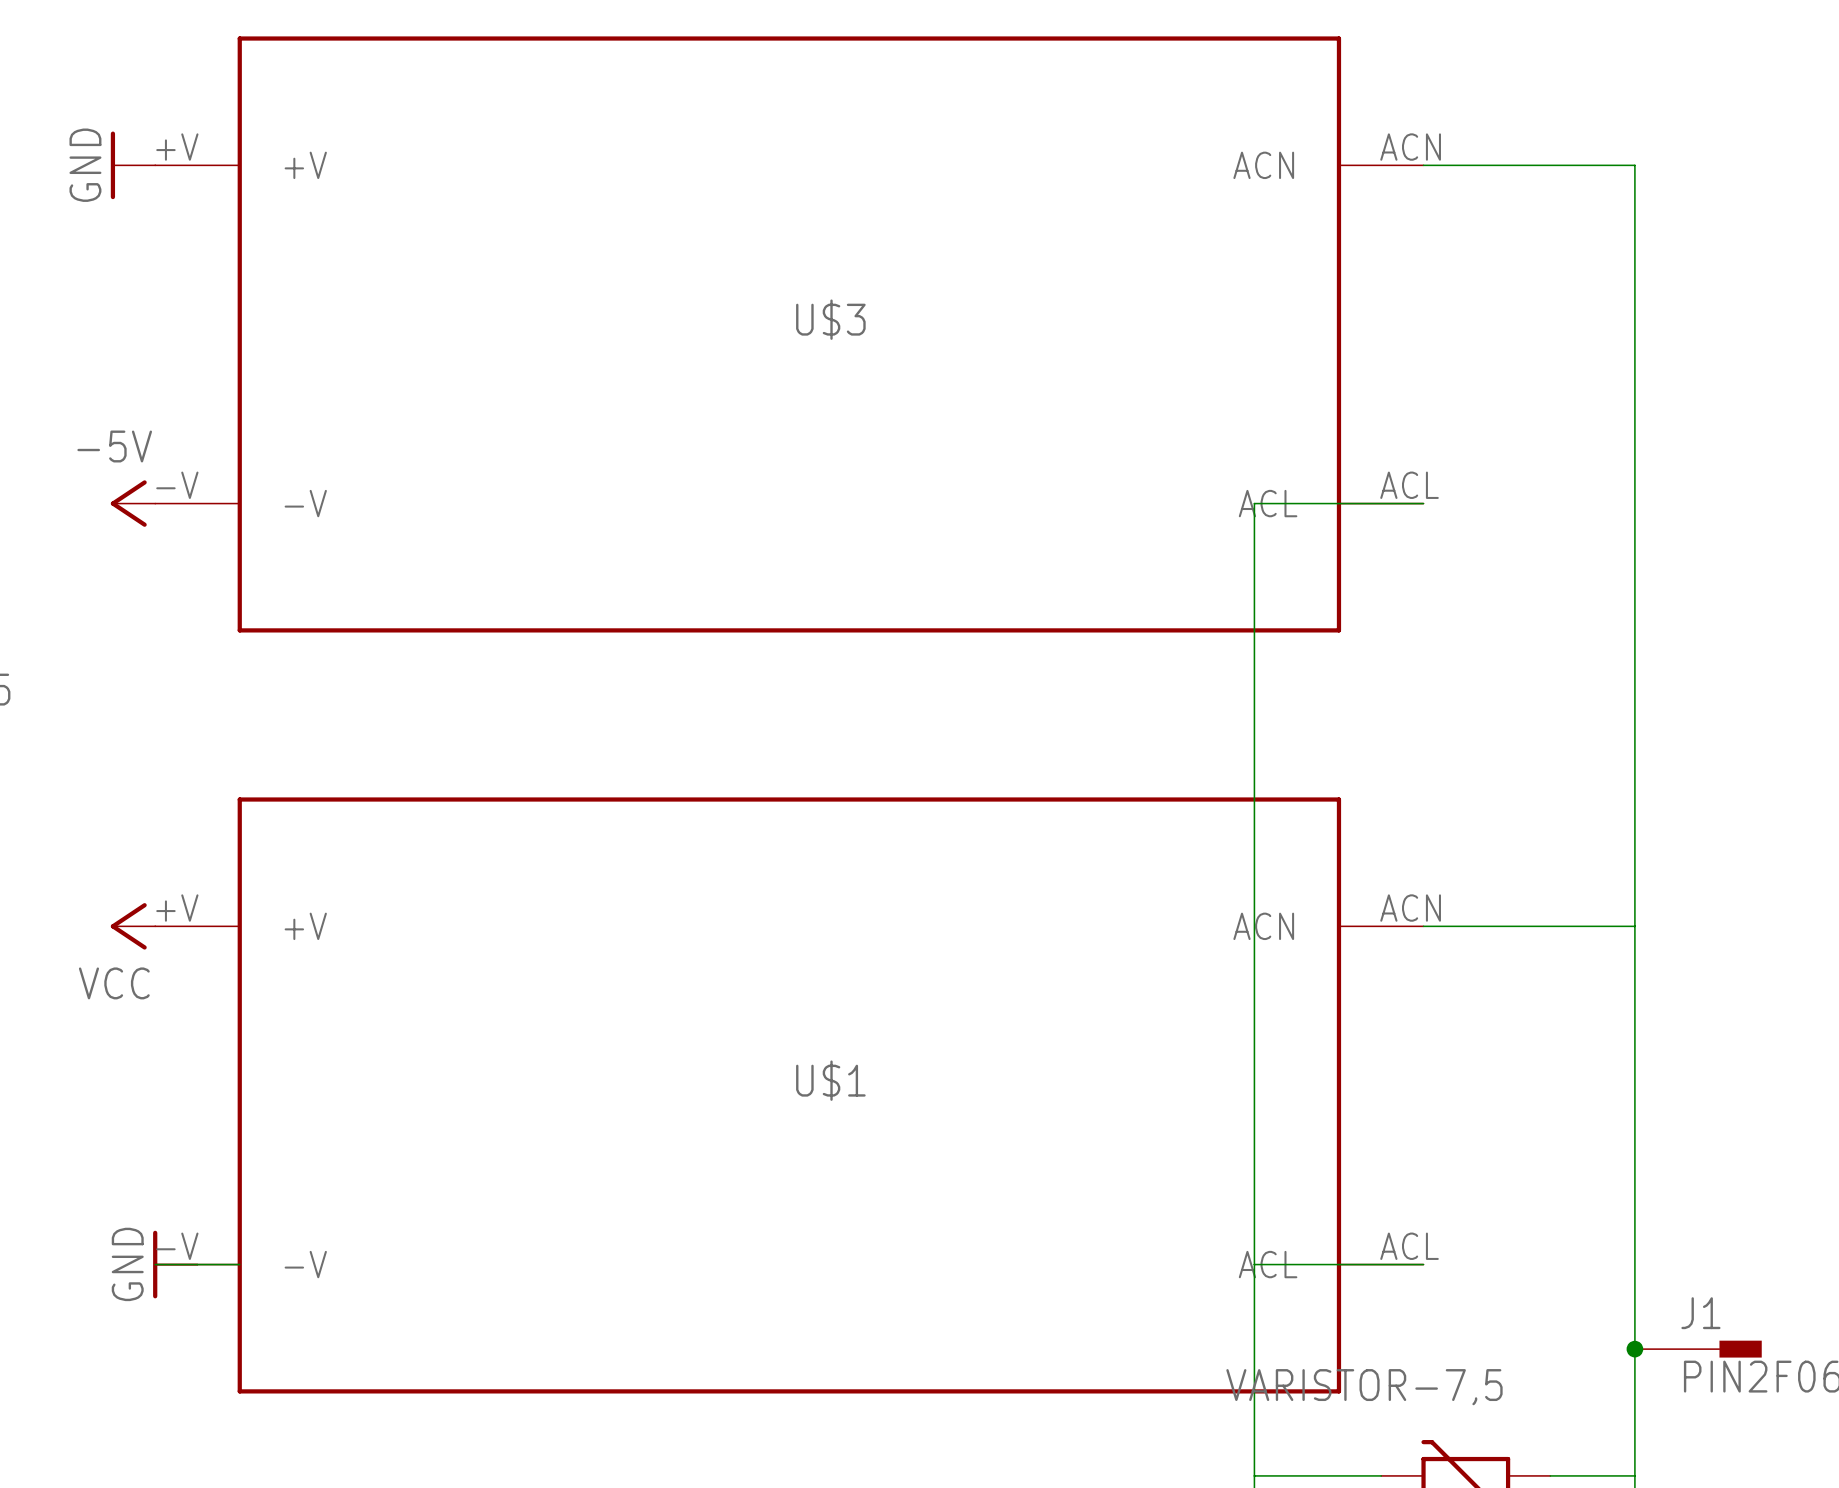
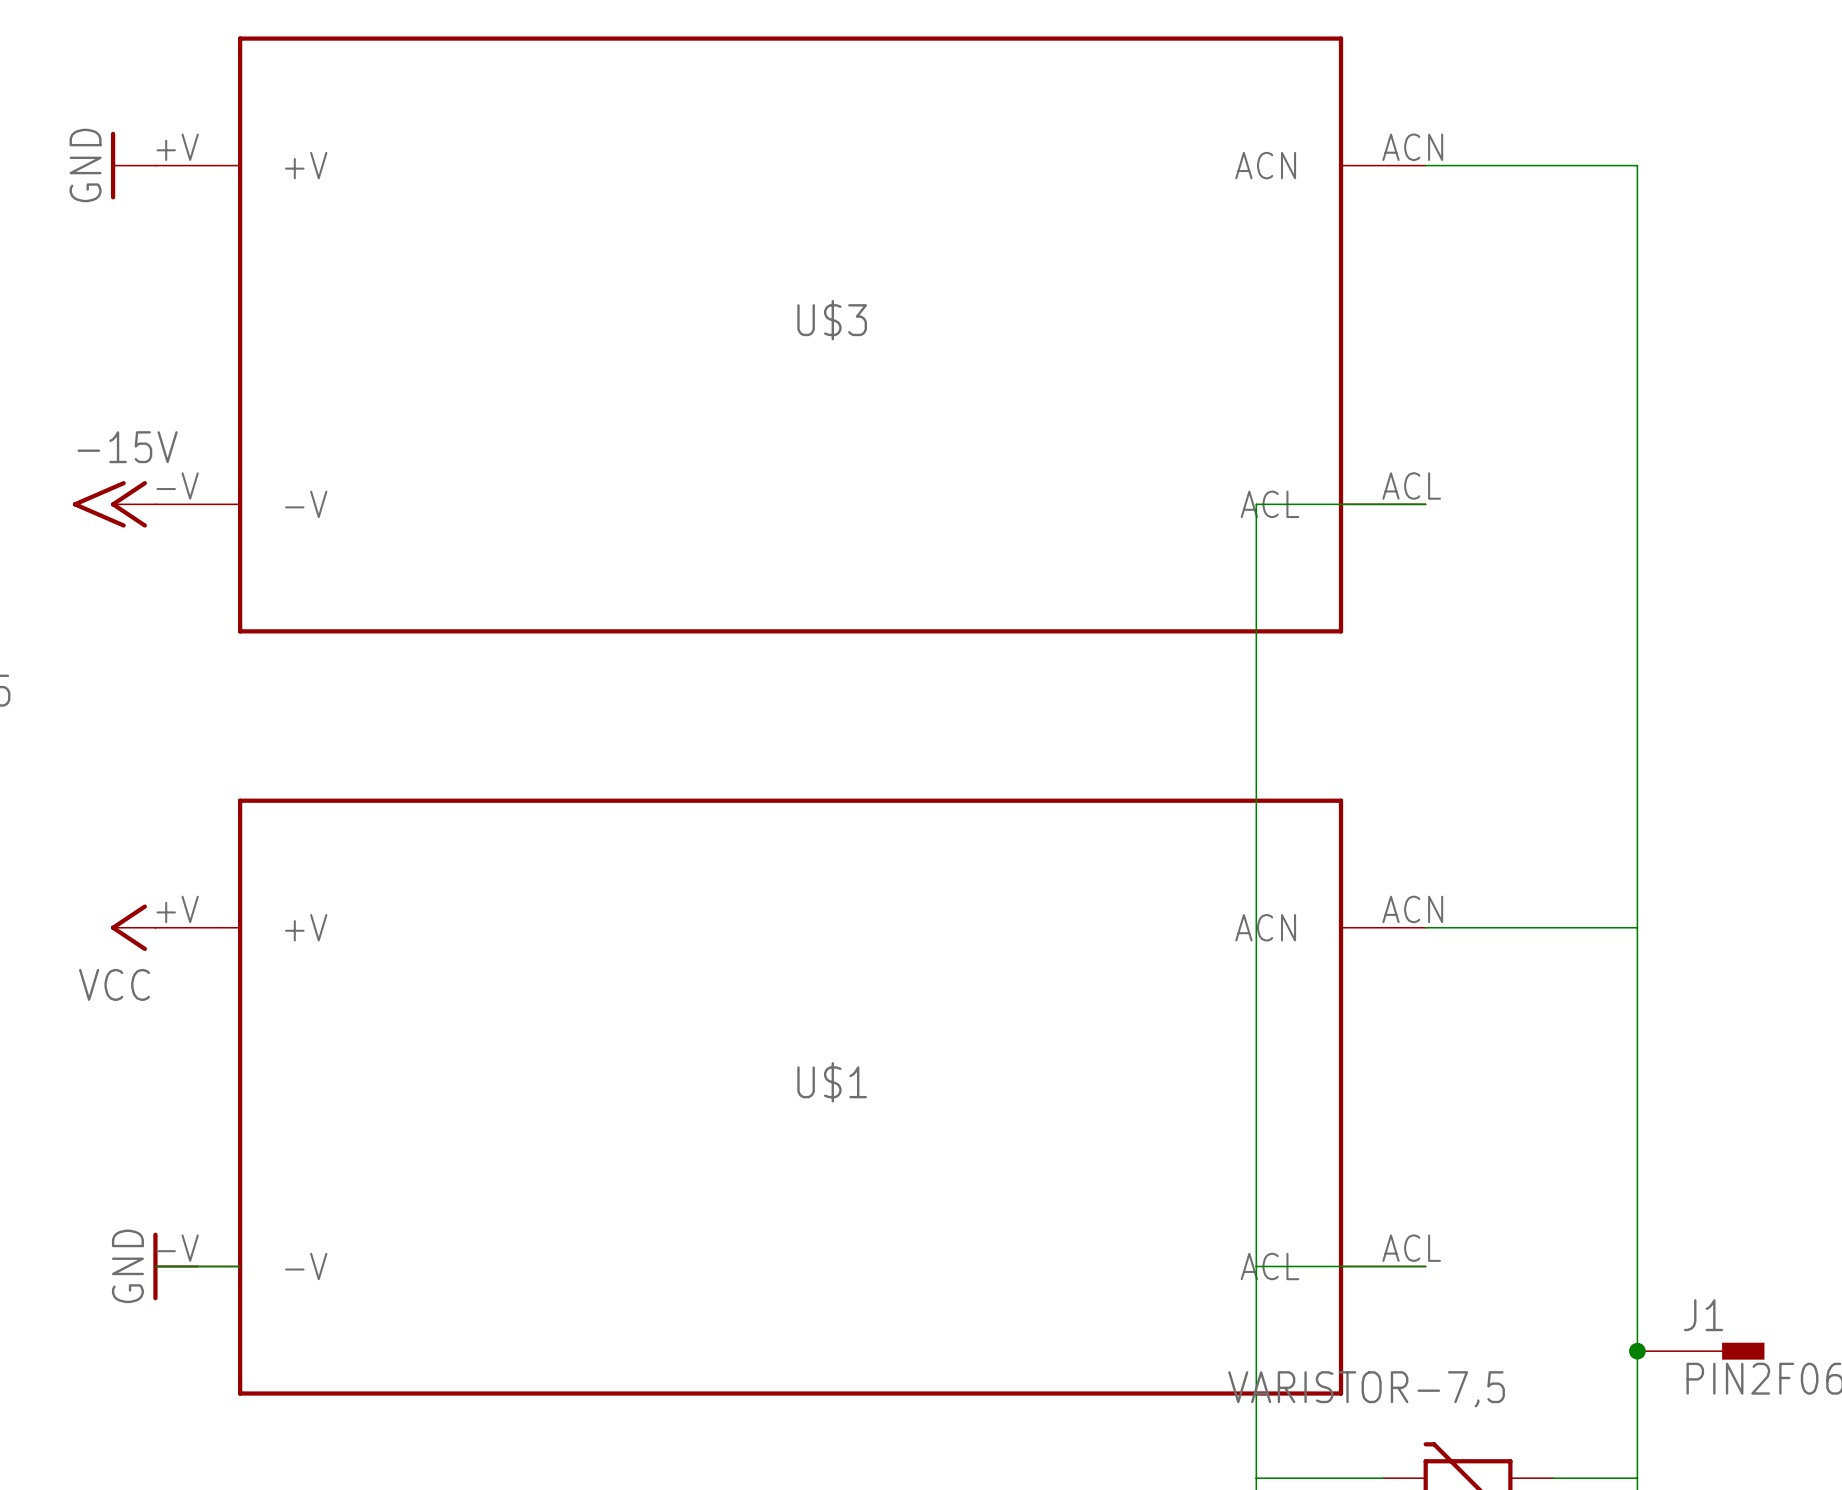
power symbol: none -> -15V (114, 504)
power symbol: -5V (133, 503) -> none

